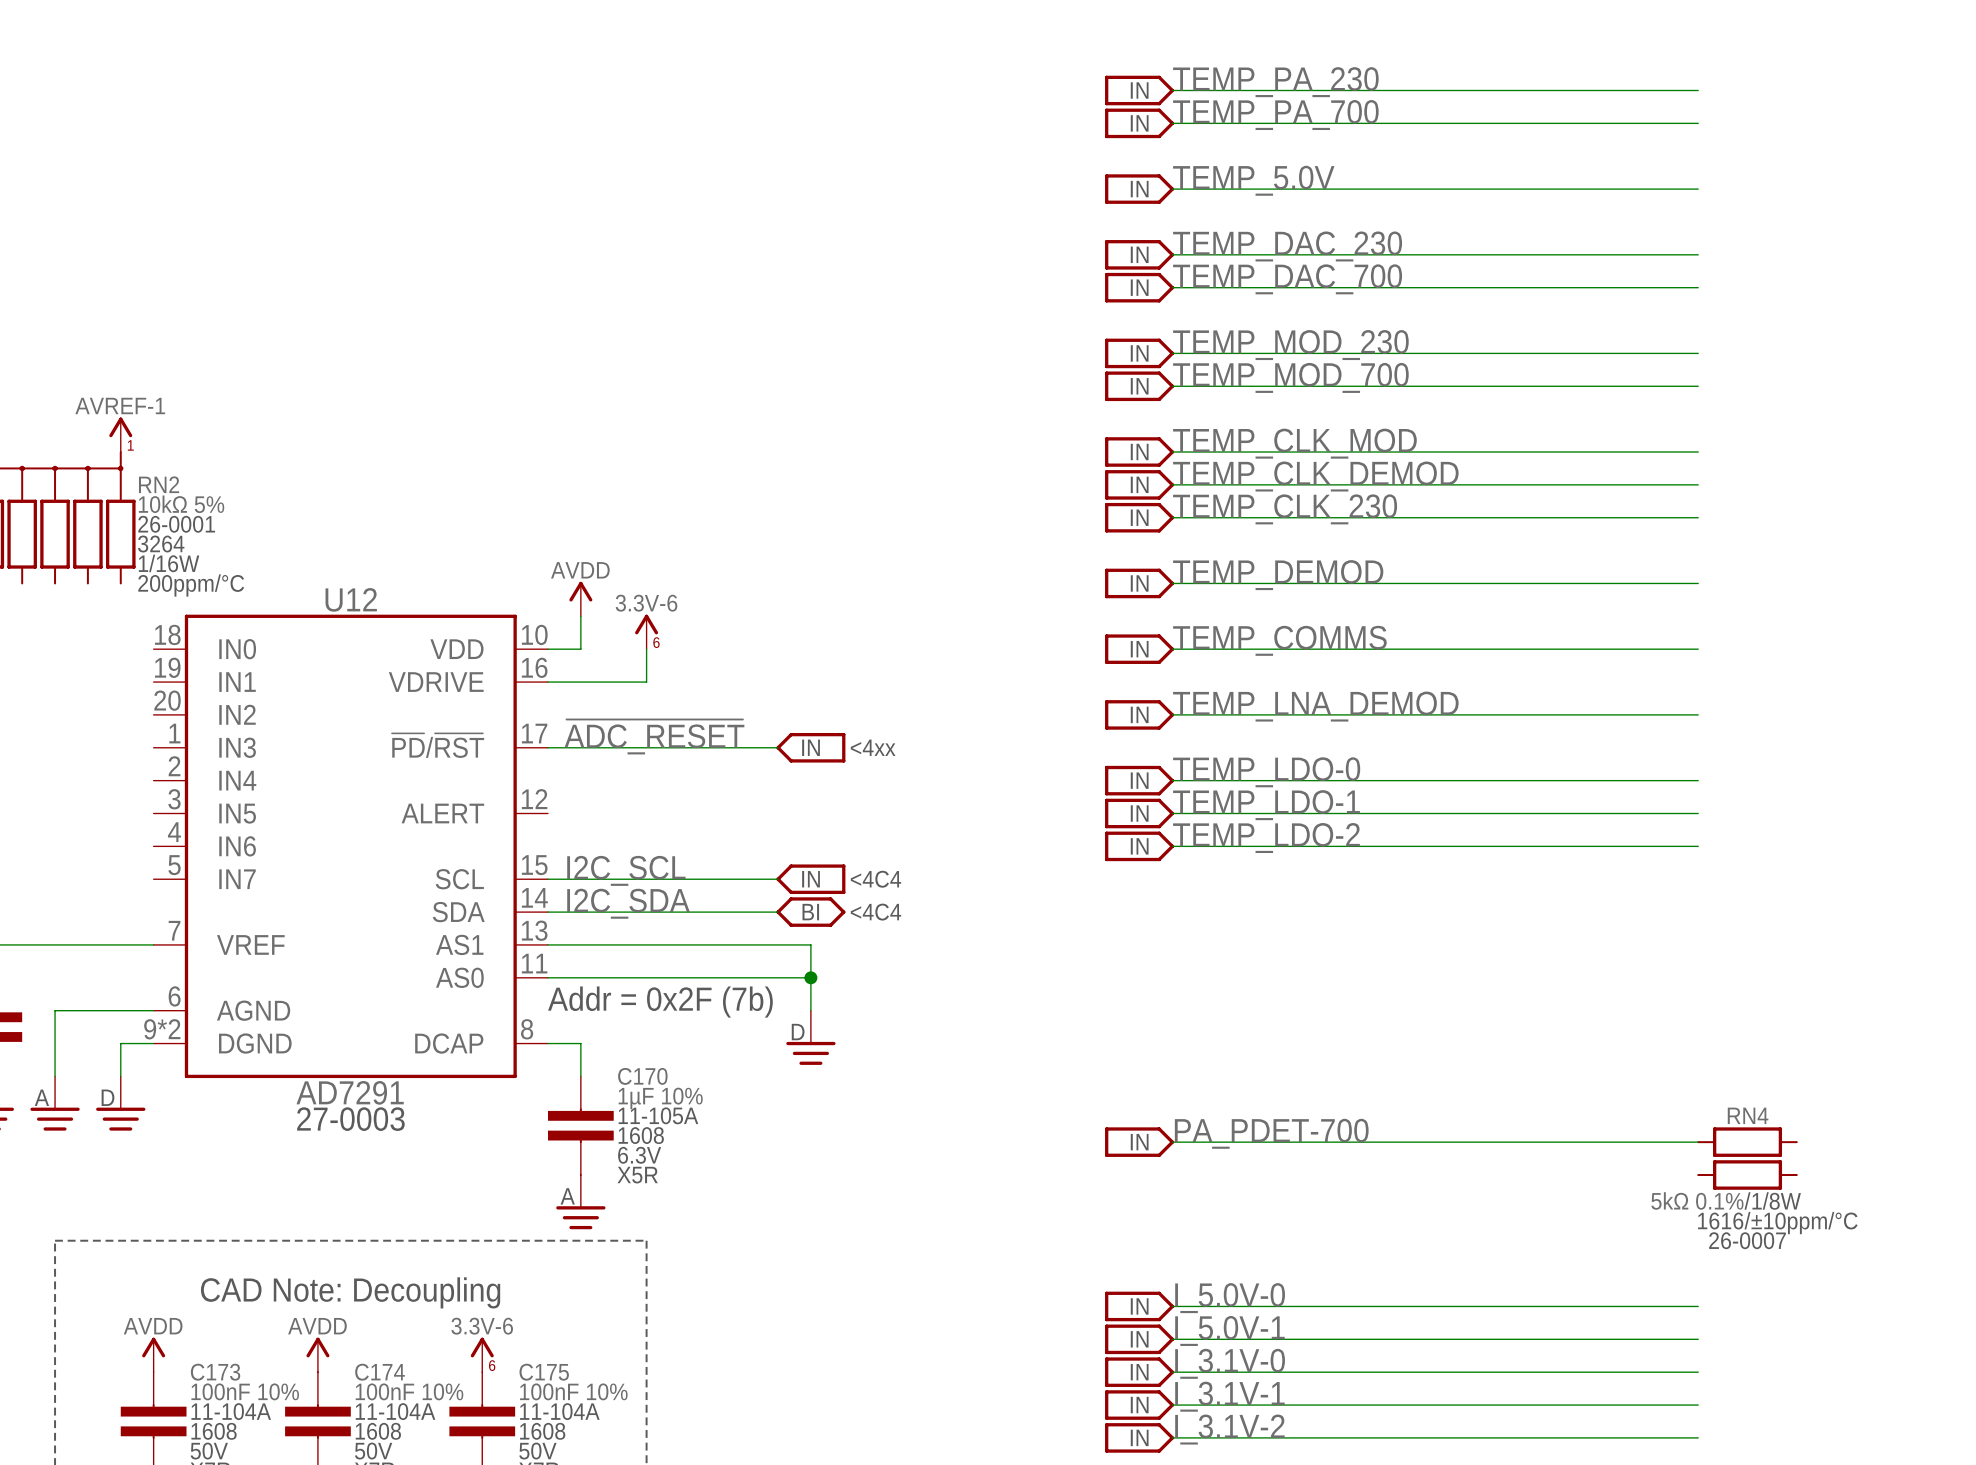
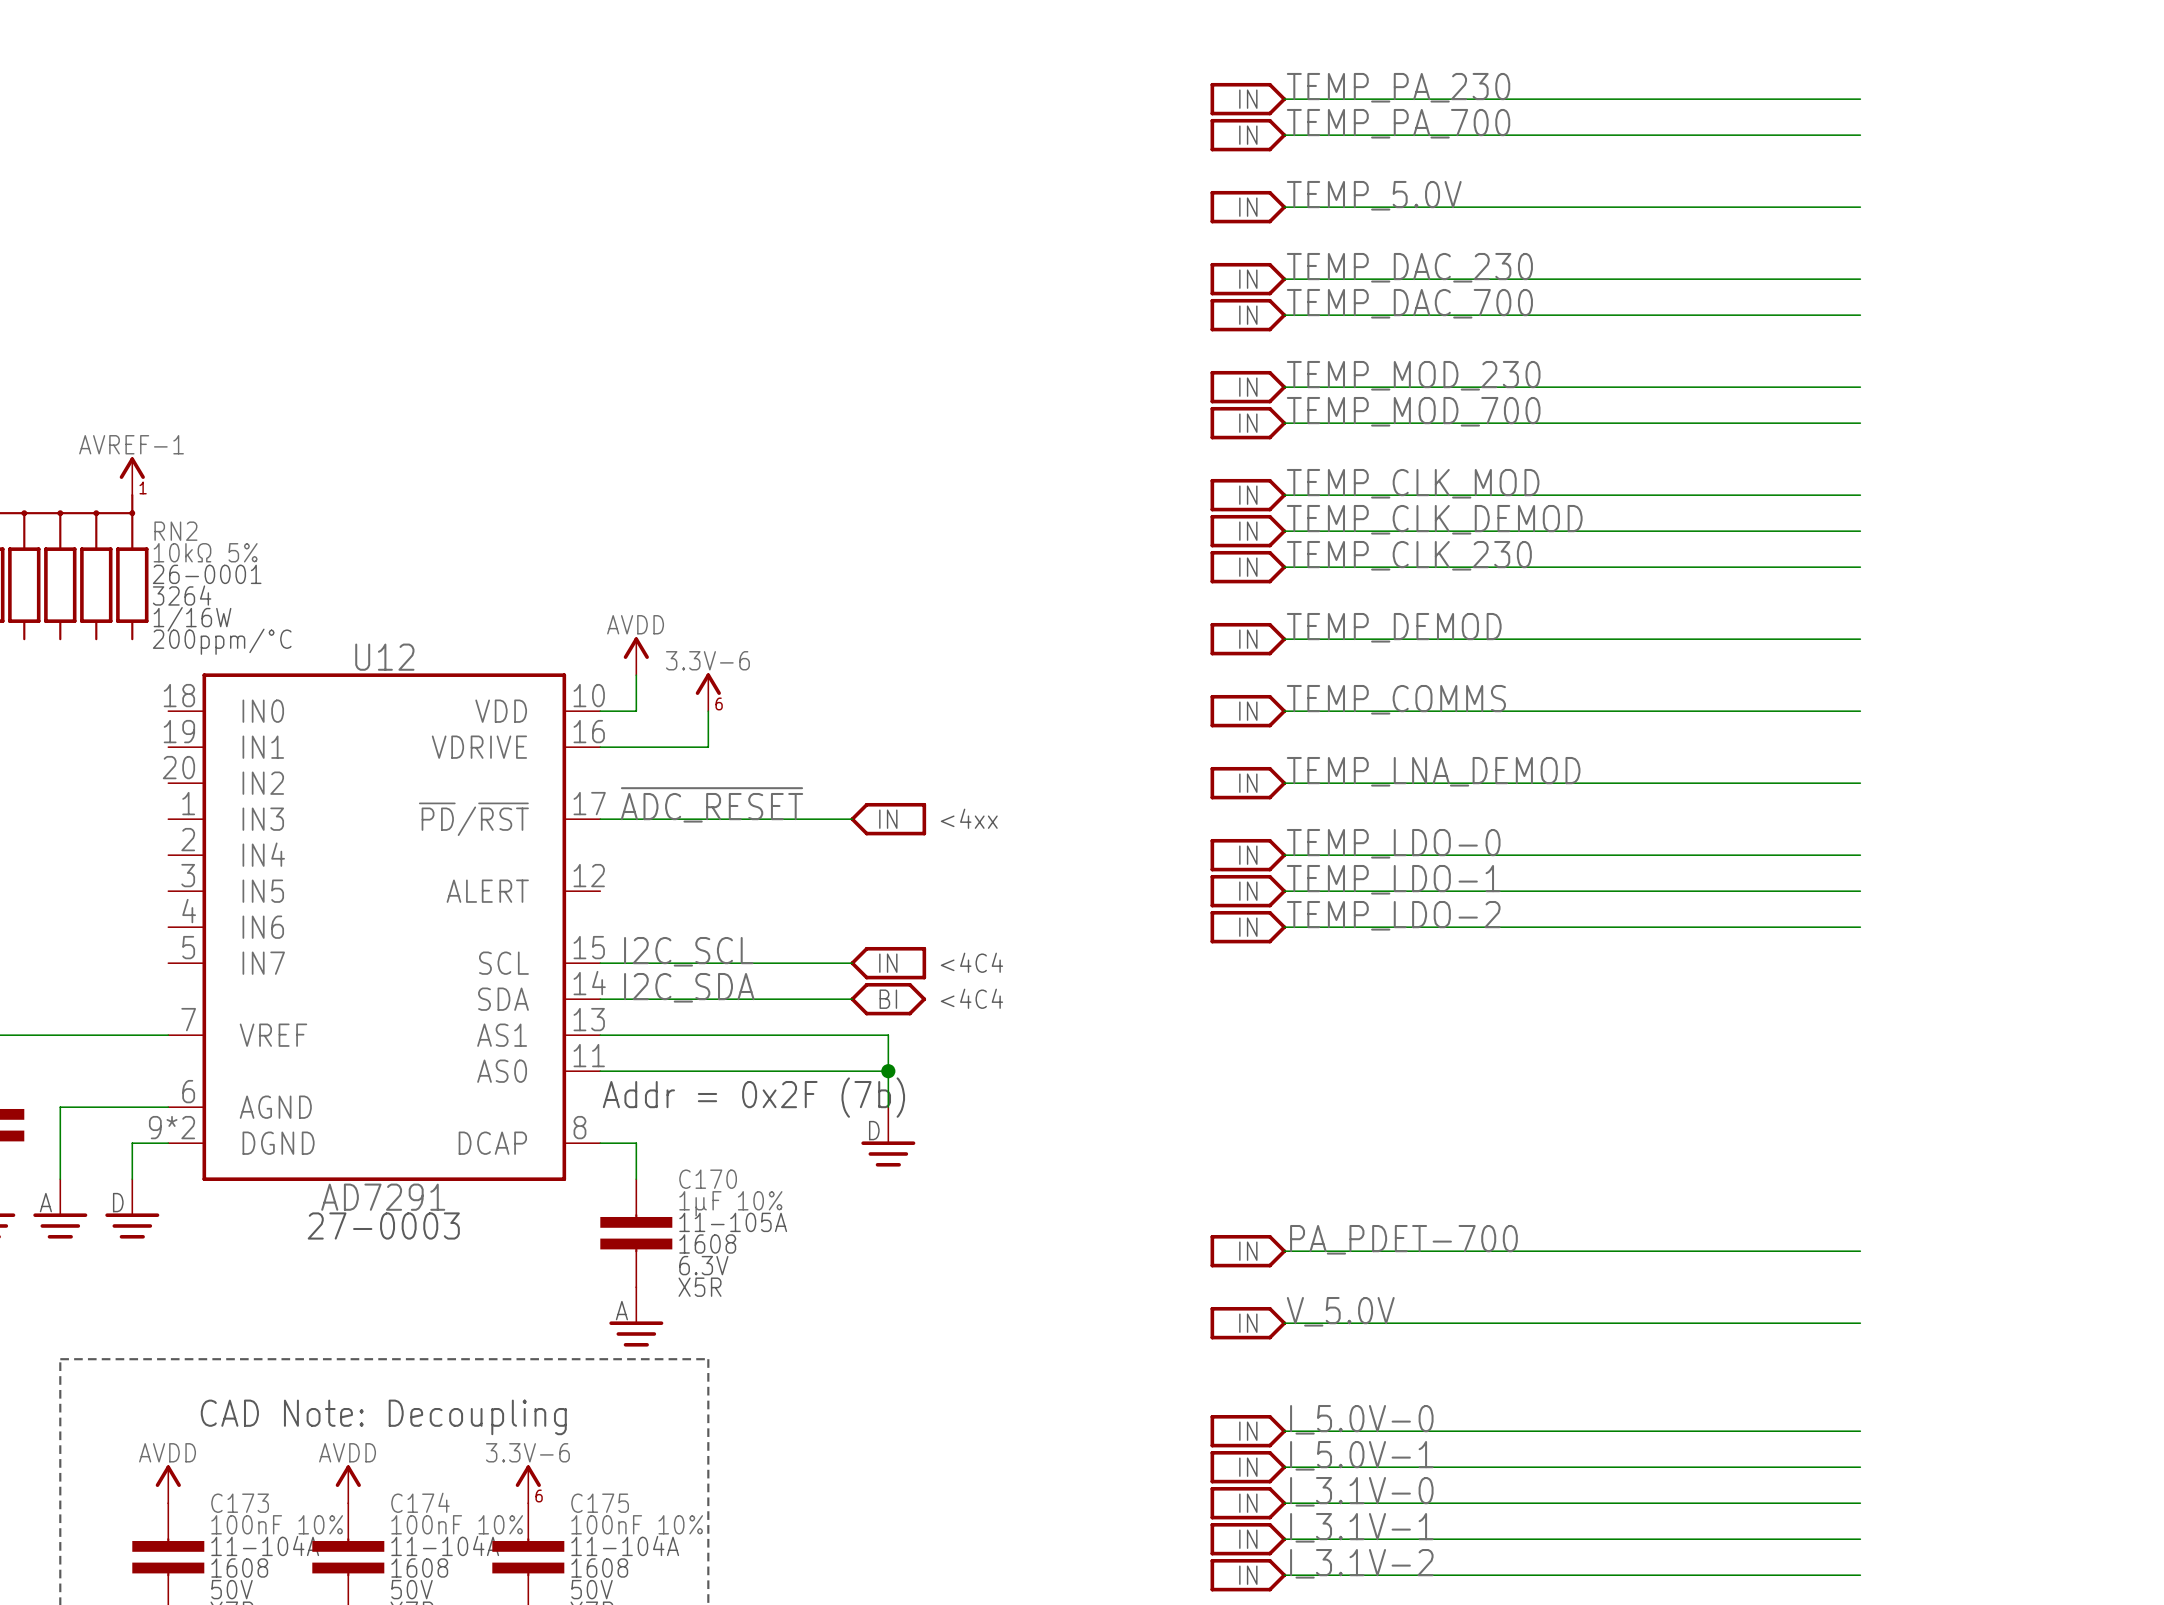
RN4: 5kΩ 0.1% (1747, 1158) -> none
label: none -> V_5.0V (1340, 1311)
part: none -> (1248, 1323)
wire: none -> (1284, 1323) (1860, 1323)

